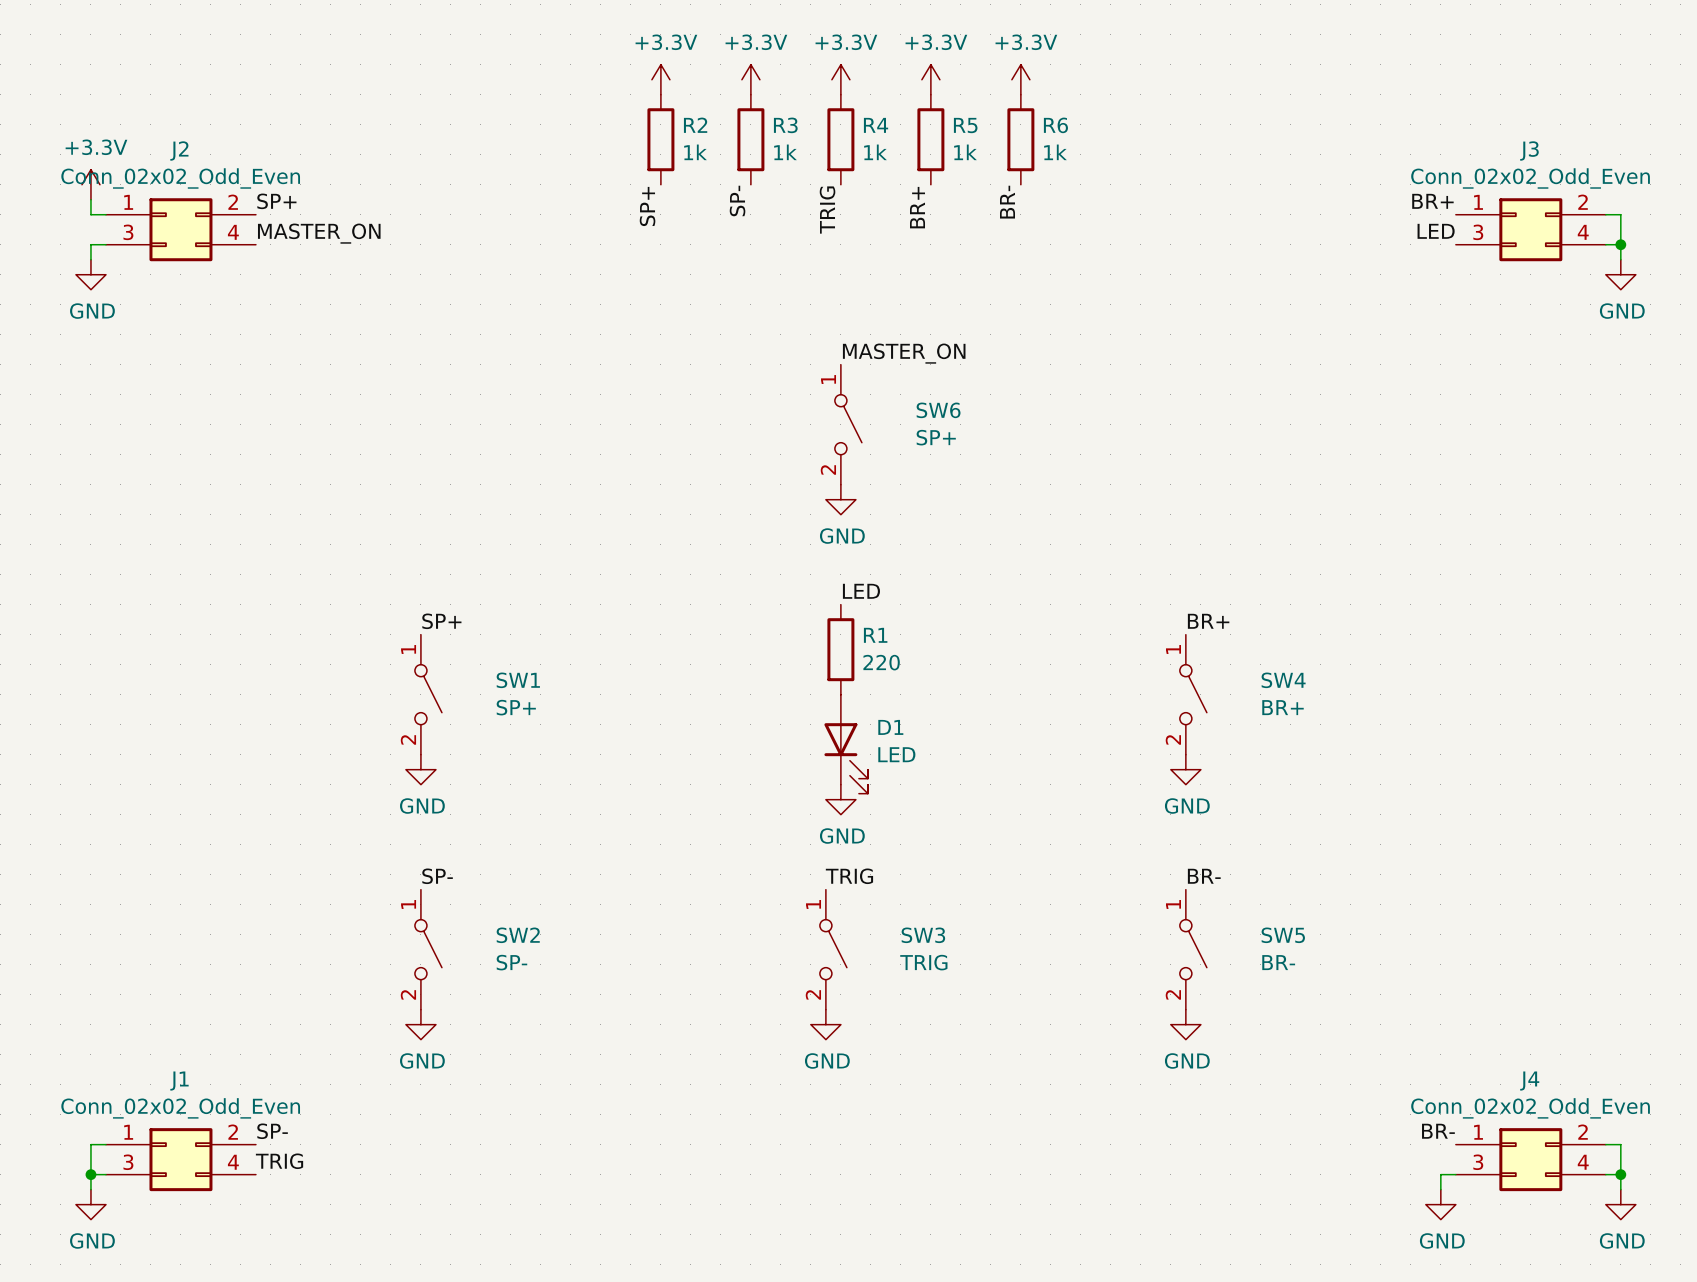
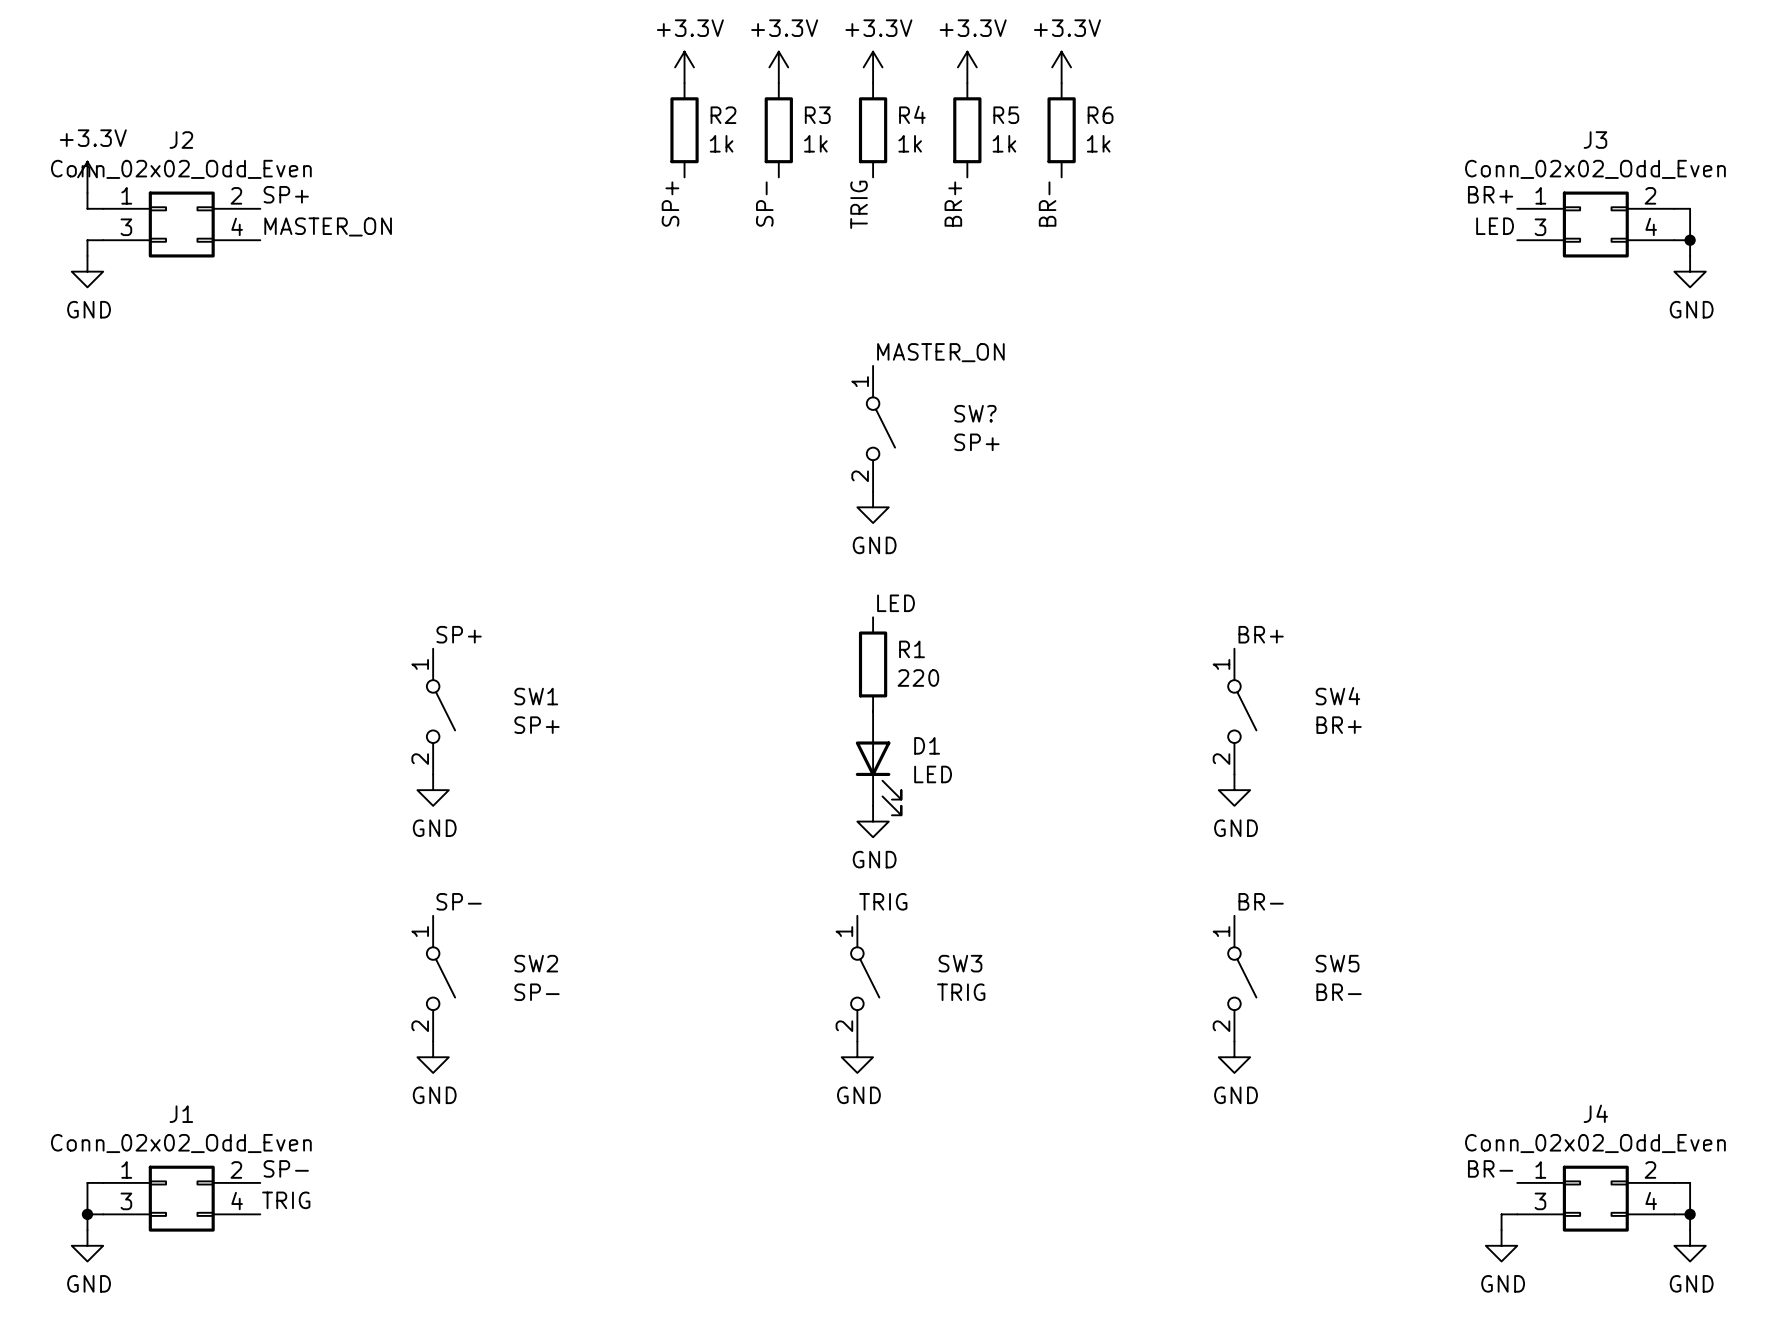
SW6 name: SW6 (938, 410) -> SW? (975, 413)

